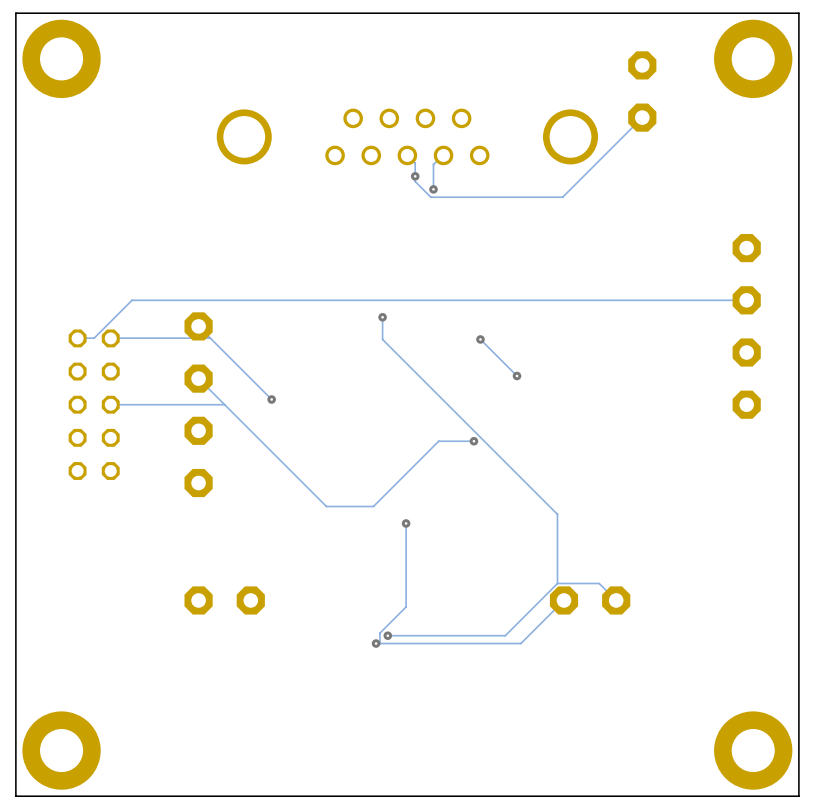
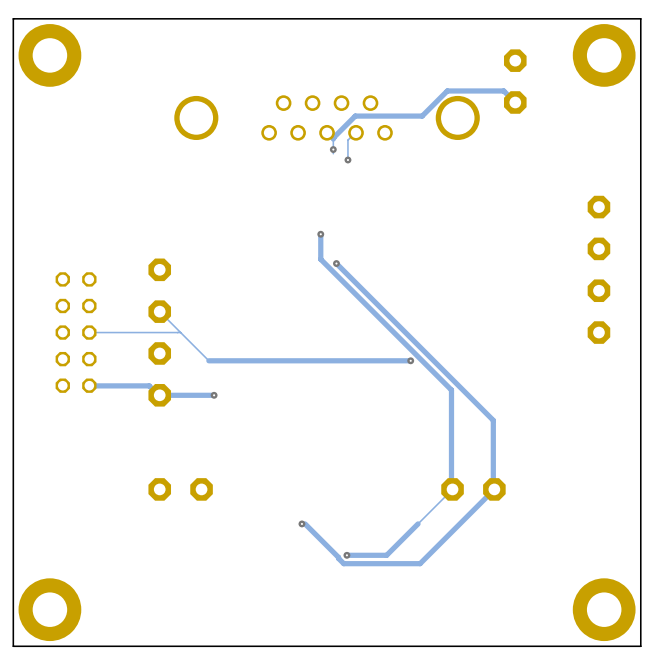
track: (642, 117) (562, 197) (430, 197) (415, 181) -> (515, 102) (503, 90) (447, 90) (422, 116) (355, 116) (333, 139)
track: none -> (320, 234) (320, 259) (451, 390) (452, 489)
via: none -> (320, 234)
track: (746, 300) (132, 300) (94, 338) (77, 338) -> none
track: (382, 317) (382, 339) (557, 514) (557, 583) -> none
via: (382, 317) -> none
via: none -> (336, 263)
track: (198, 326) (271, 399) -> none
track: (210, 338) (110, 338) -> none
track: (480, 339) (517, 376) -> none
via: (480, 339) -> none
via: (517, 376) -> none
via: (271, 399) -> none
track: (259, 439) (326, 506) (373, 506) (438, 441) (473, 441) -> (208, 360) (410, 360)
via: none -> (410, 360)
via: (473, 441) -> none
track: none -> (89, 385) (149, 385) (159, 395) (214, 395)
via: none -> (214, 395)
track: (406, 523) (406, 606) (379, 633) (379, 643) -> (336, 263) (493, 420) (494, 489) (420, 563) (343, 563) (305, 523)
via: (406, 523) -> none
track: (557, 583) (505, 635) (387, 635) -> none
track: (557, 583) (599, 583) (616, 600) -> none
via position: (387, 635) -> (346, 555)
track: (520, 643) (376, 643) -> (418, 523) (386, 555) (346, 555)

